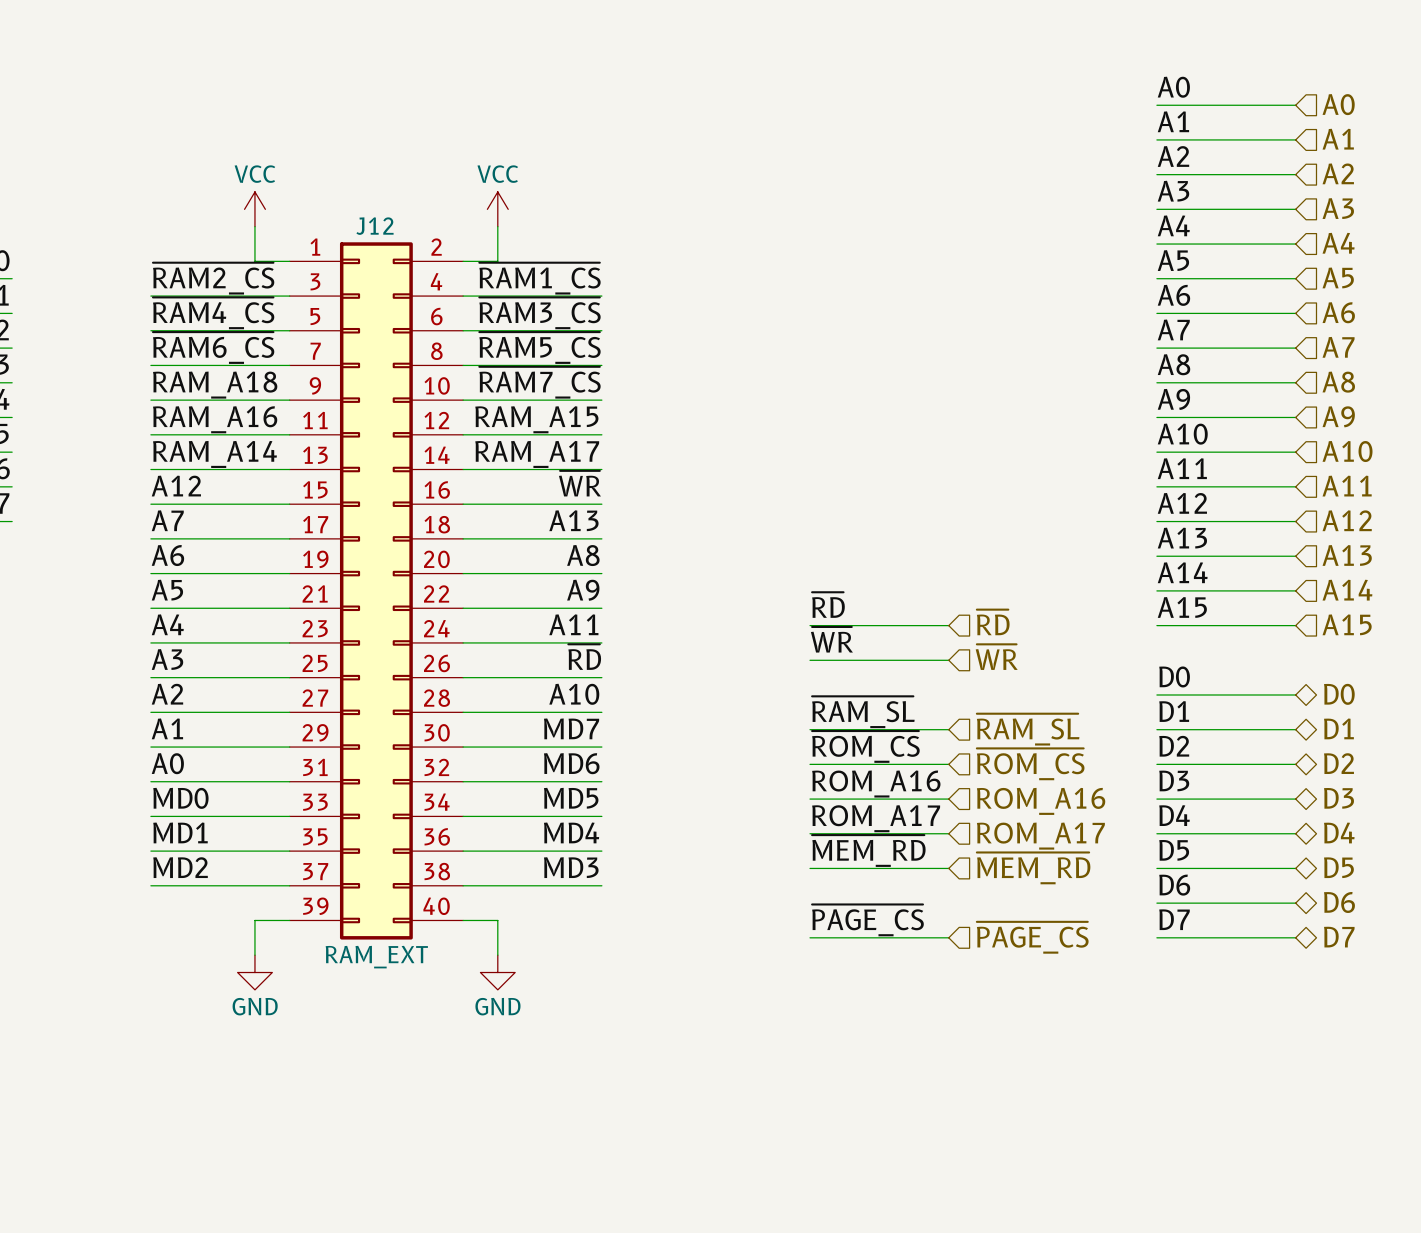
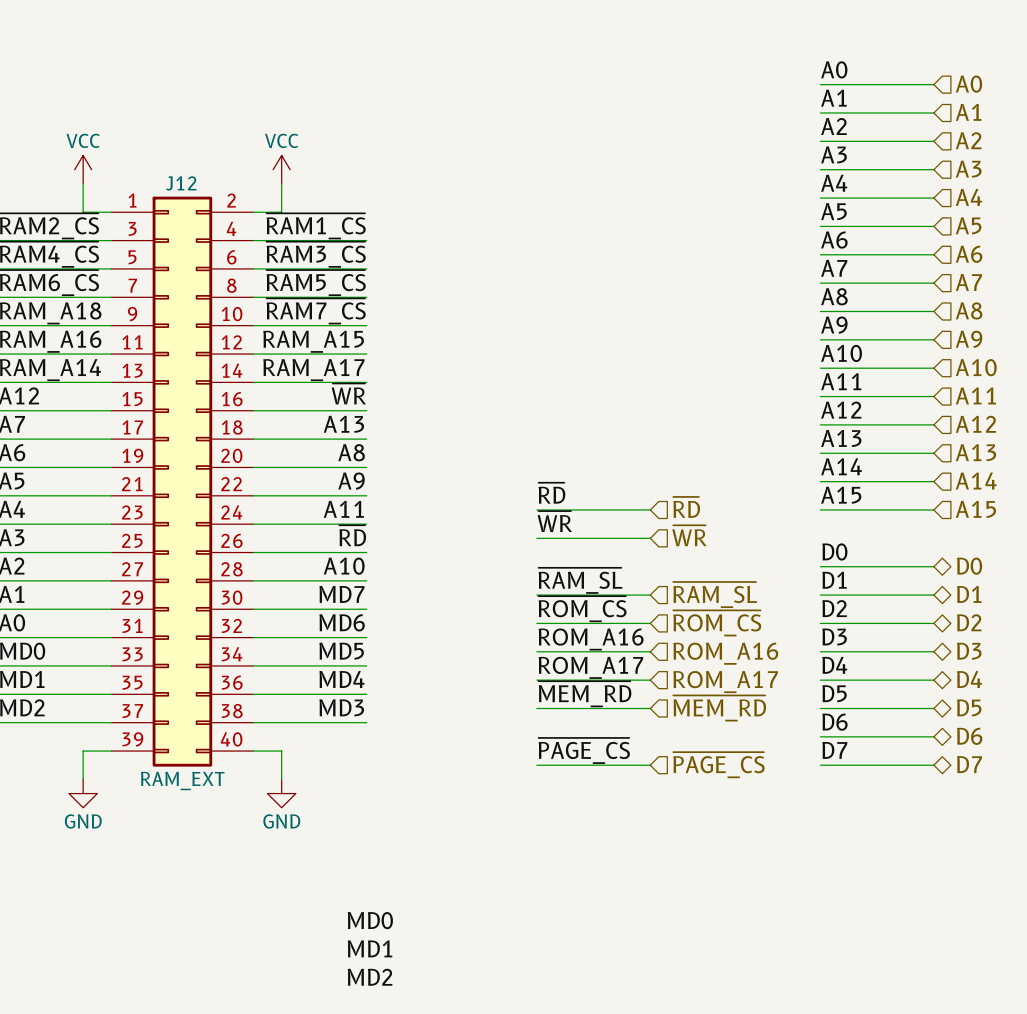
label: none -> MD0 (370, 920)
label: none -> MD1 (370, 948)
label: none -> MD2 (370, 977)

